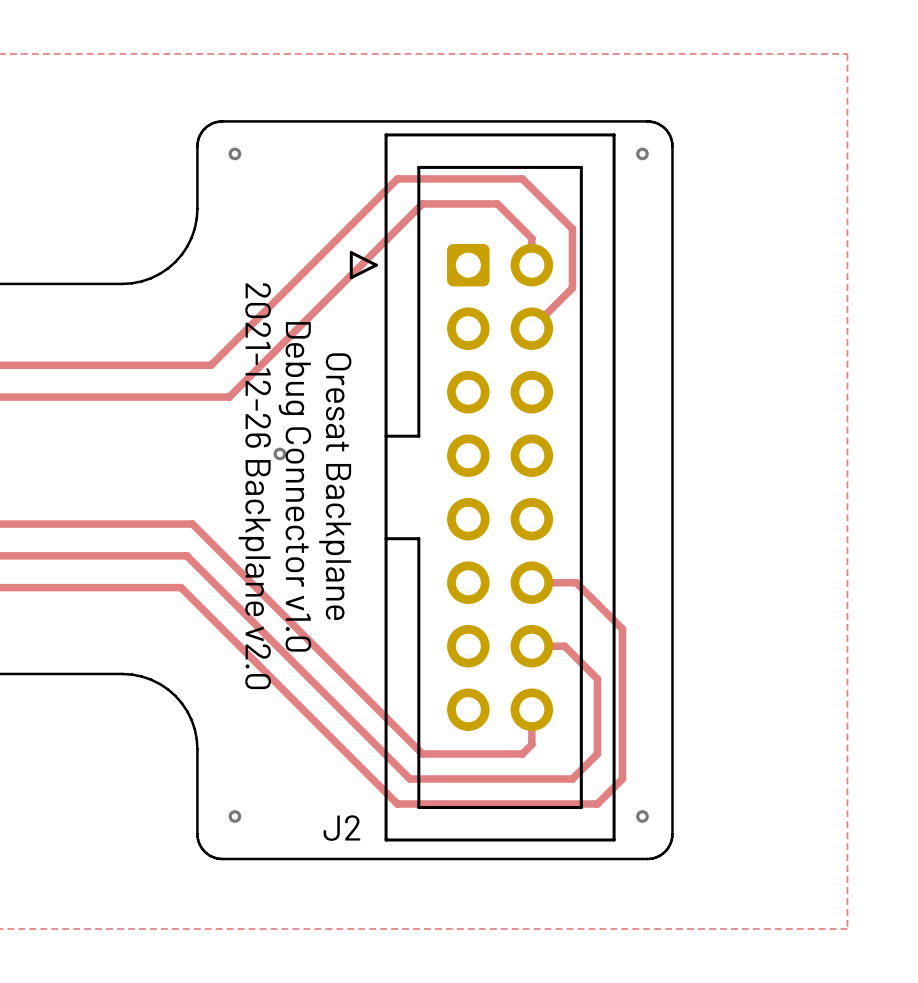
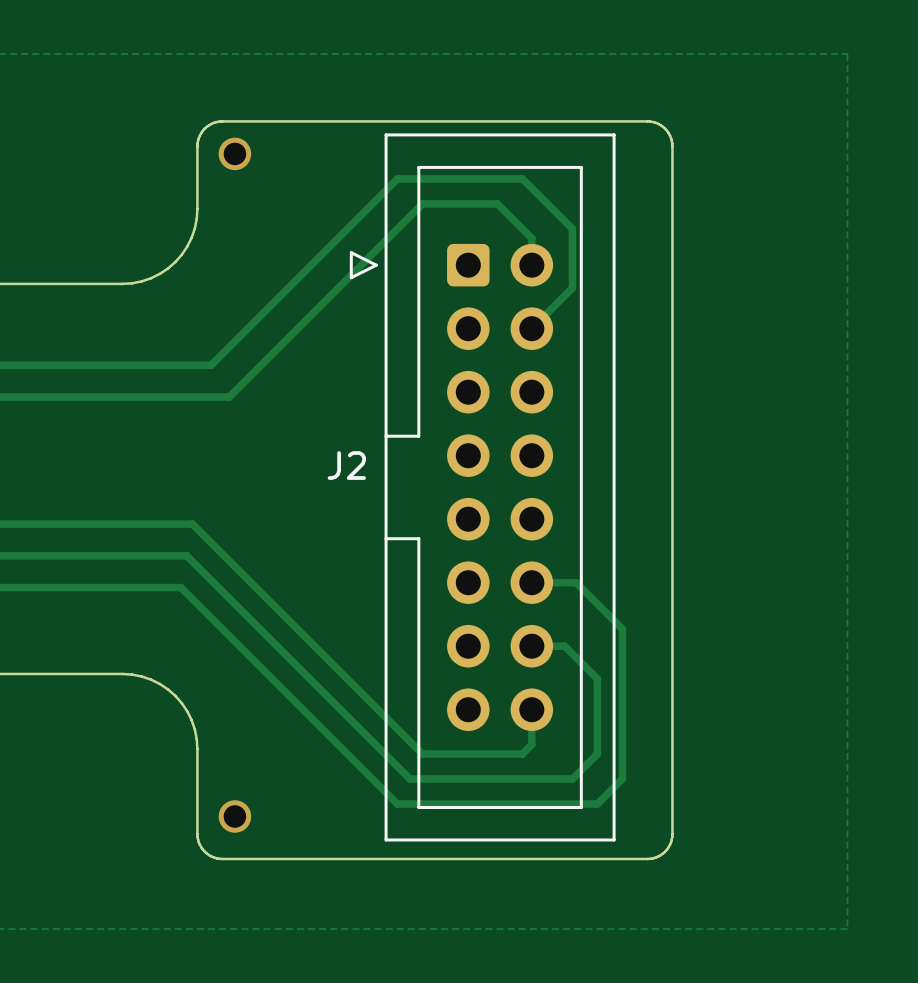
via size: [228, 147, 242, 161] -> [218, 137, 252, 171]
via: (642, 153) -> none
via: (279, 453) -> none
text: 2021-12-26 Backplane v2.0 (254, 486) -> none
text: Debug Connector v1.0 (294, 486) -> none
text: Oresat Backplane (335, 486) -> none
via size: [228, 810, 242, 823] -> [218, 800, 252, 833]
via: (642, 816) -> none
J2 name position: J2 (341, 828) -> J2 (346, 465)

